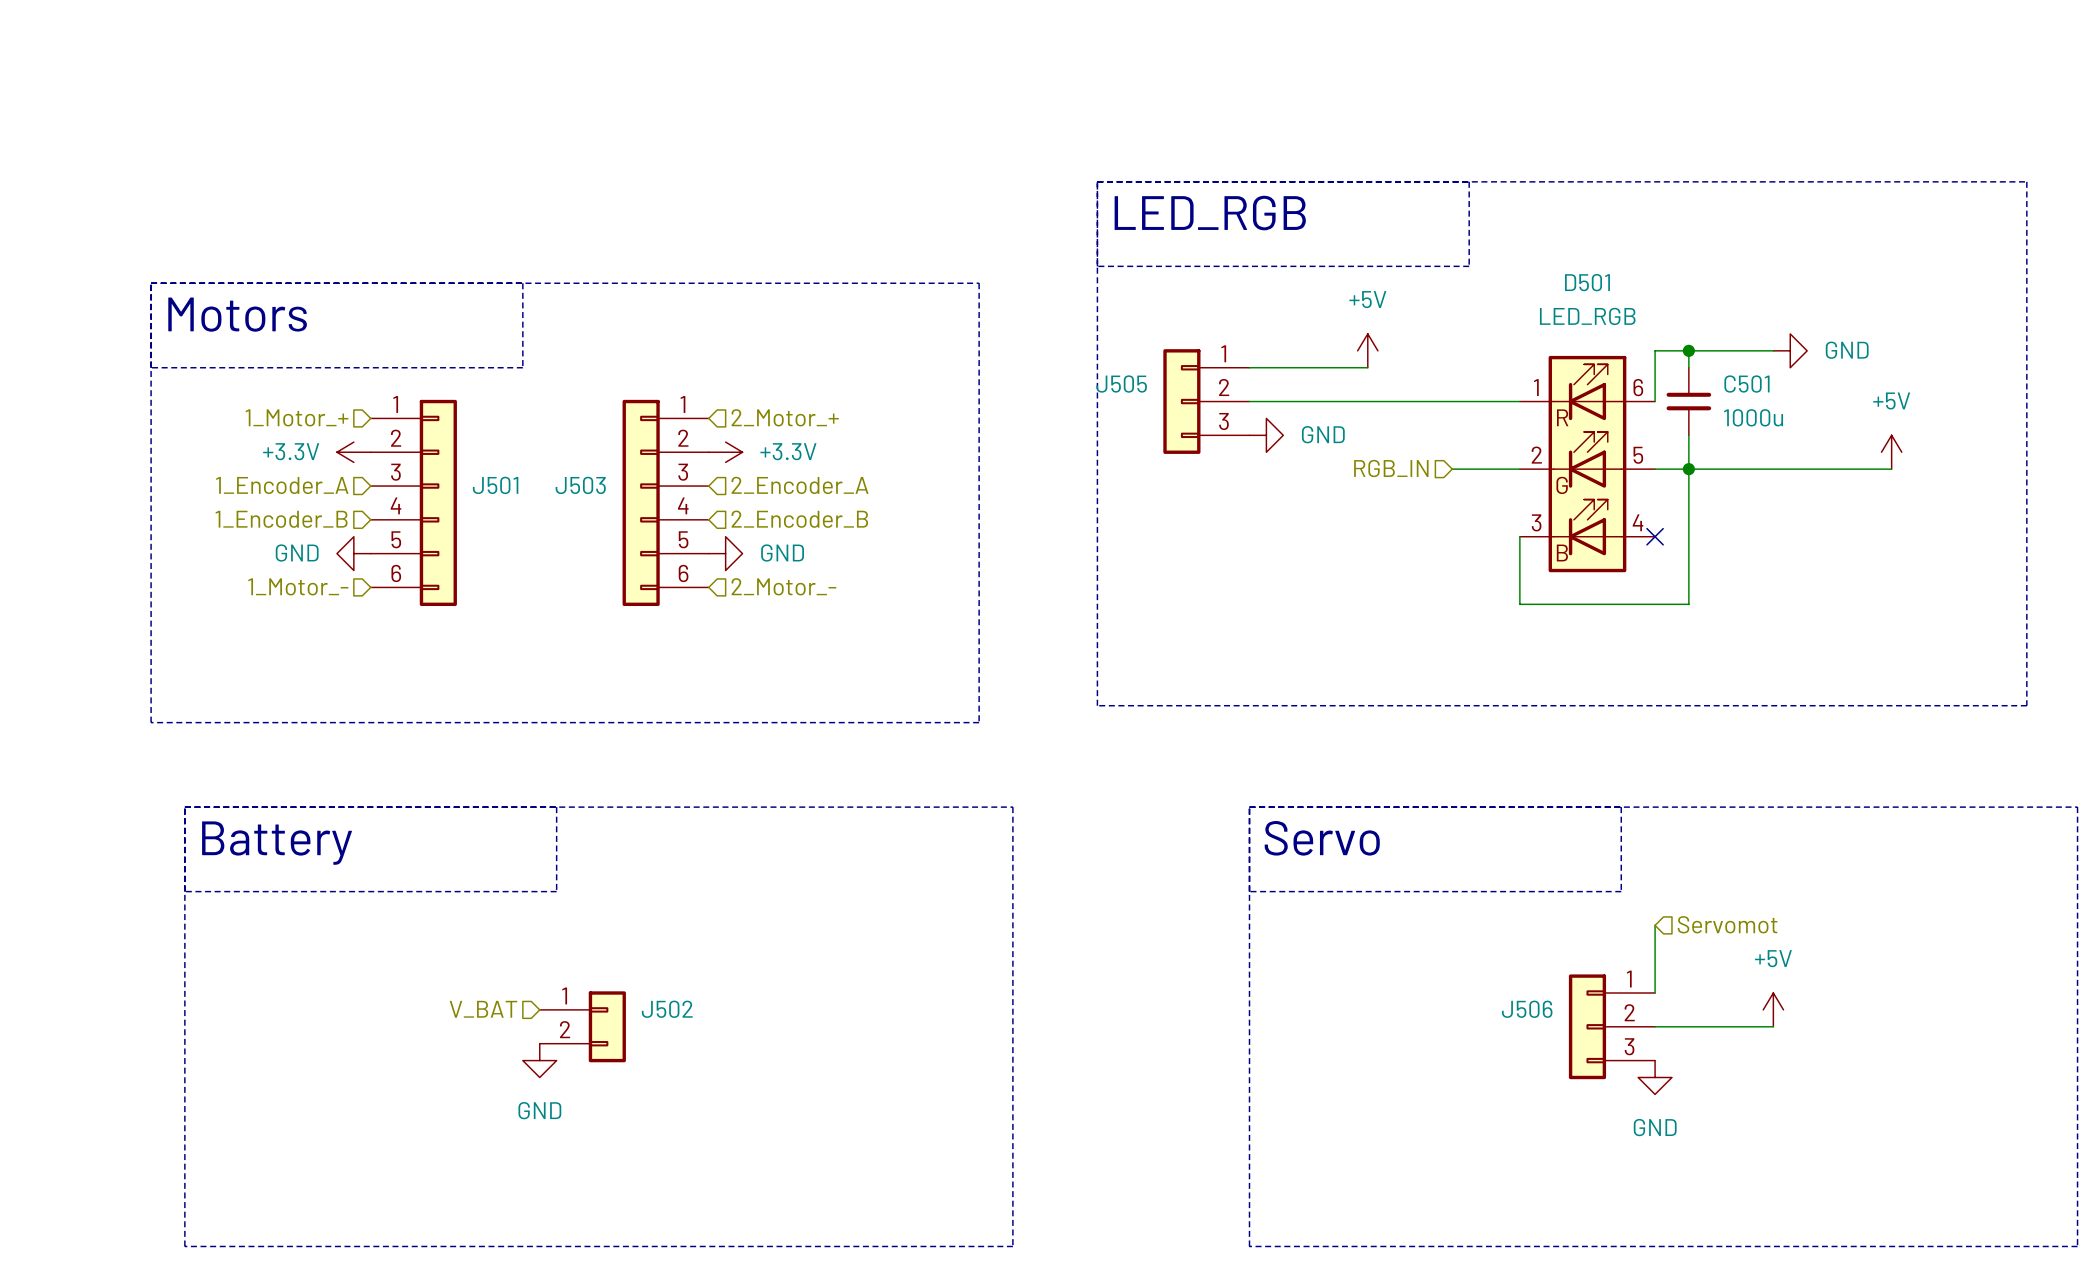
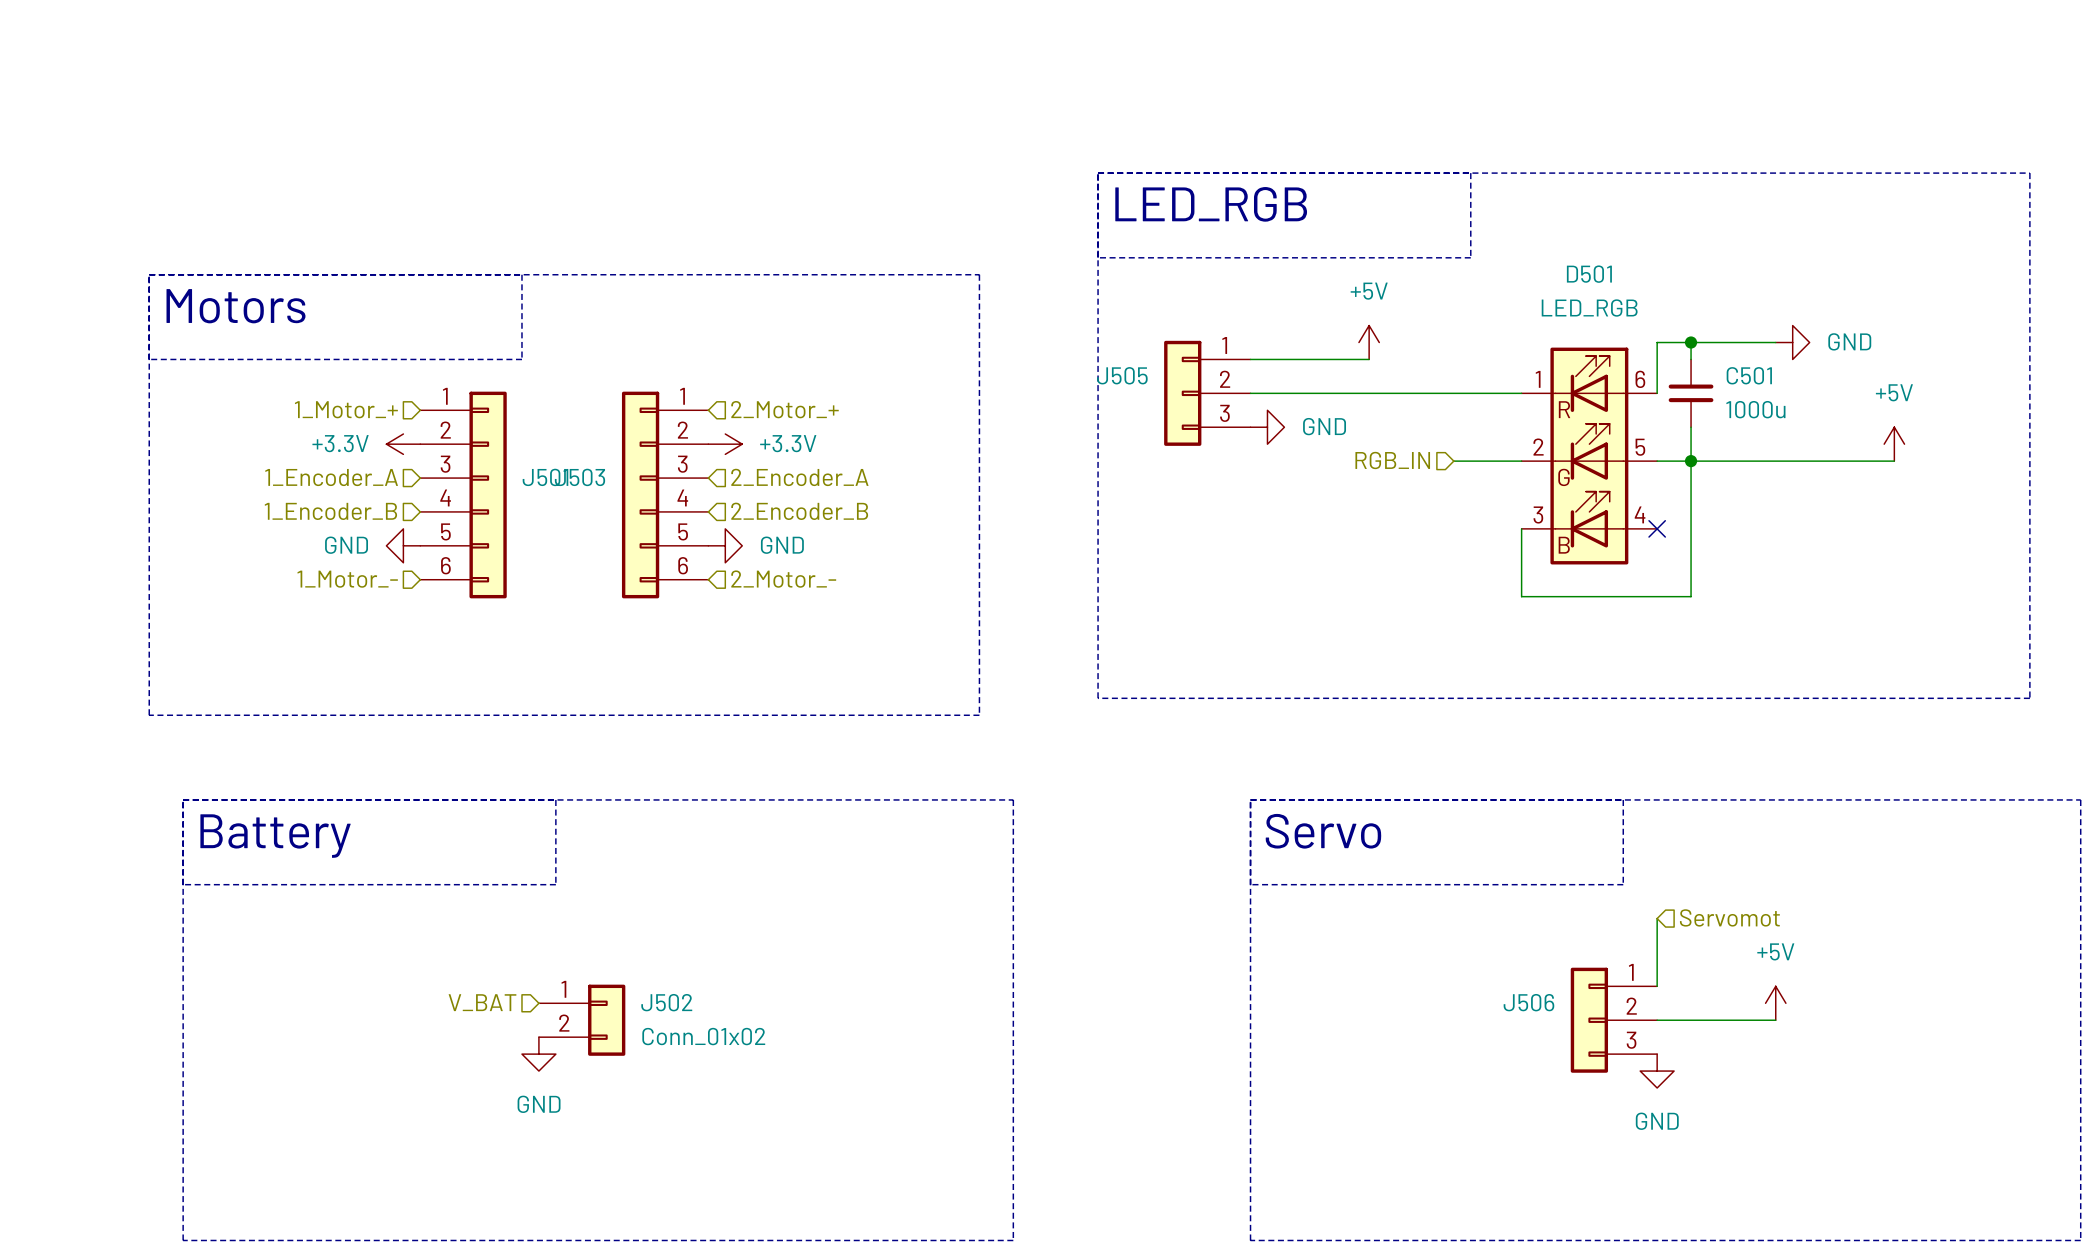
hierarchical label position: 1_Motor_+ (297, 417) -> 1_Motor_+ (346, 409)
power symbol position: +3.3V (353, 452) -> +3.3V (403, 444)
hierarchical label position: 1_Encoder_A (282, 485) -> 1_Encoder_A (331, 477)
J501 position: (413, 502) -> (463, 495)
hierarchical label position: 1_Encoder_B (281, 519) -> 1_Encoder_B (330, 511)
power symbol position: GND (353, 553) -> GND (403, 545)
hierarchical label position: 1_Motor_- (298, 586) -> 1_Motor_- (347, 579)
J502 value: none -> Conn_01x02 (703, 1036)

